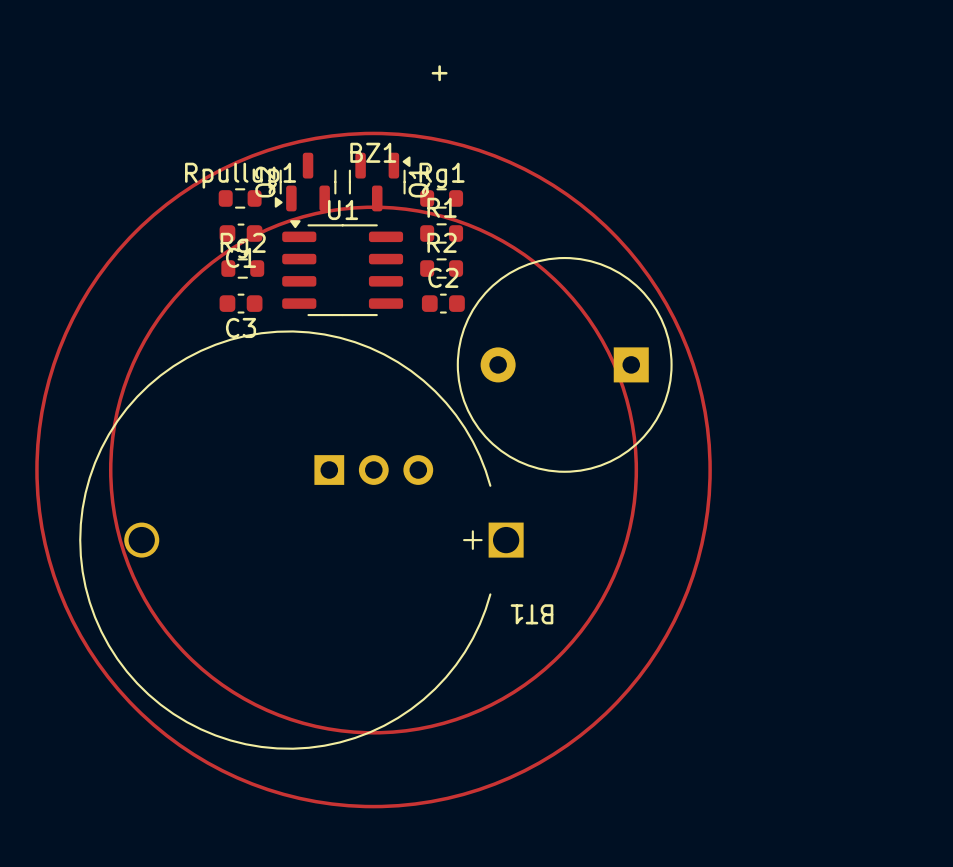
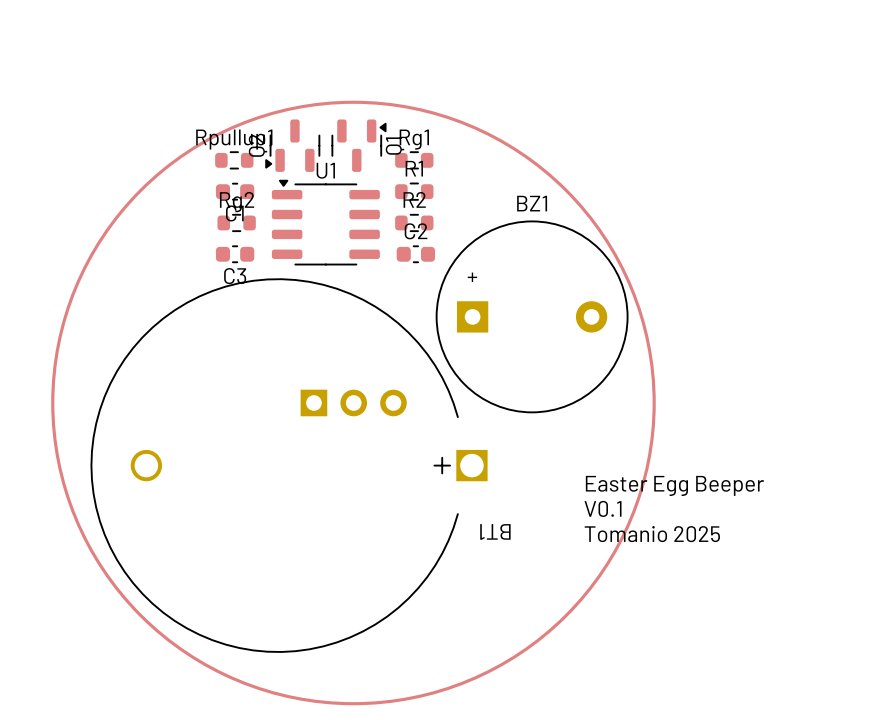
BZ1 name position: BZ1 (373, 152) -> BZ1 (532, 203)
drawing: [108, 205, 639, 735] -> none
BZ1 footprint: [456, 256, 673, 473] -> [435, 220, 629, 414]
text: none -> Easter Egg Beeper (674, 485)
text: none -> V0.1 (603, 508)
text: none -> Tomanio 2025 (652, 534)

